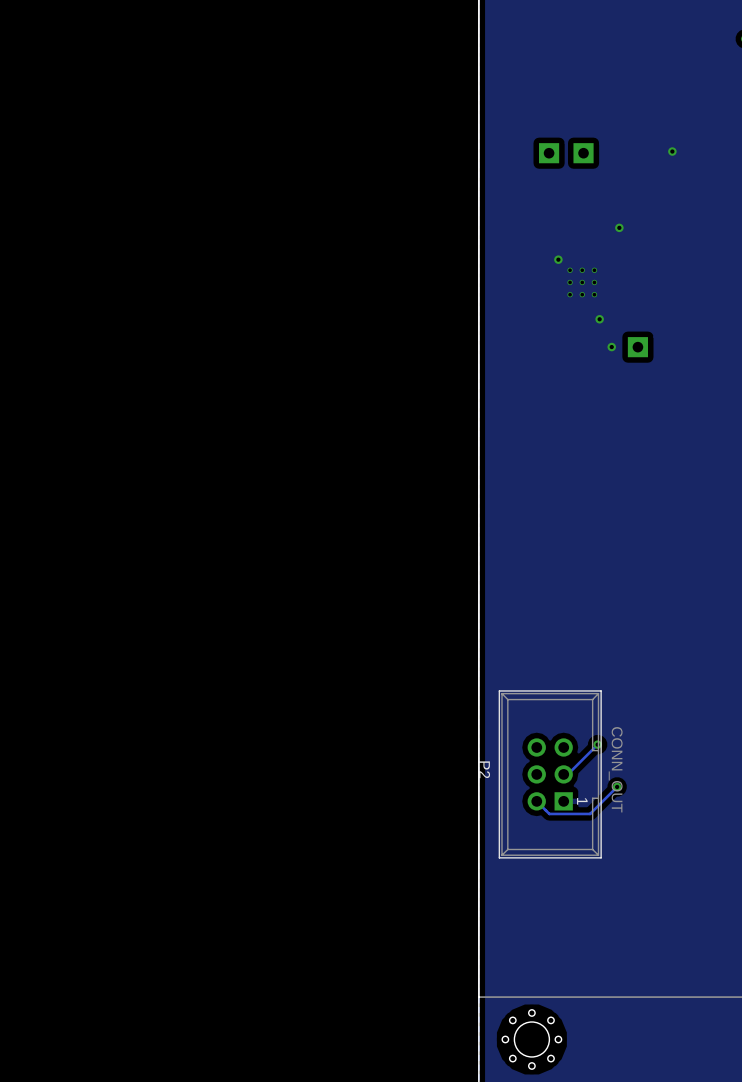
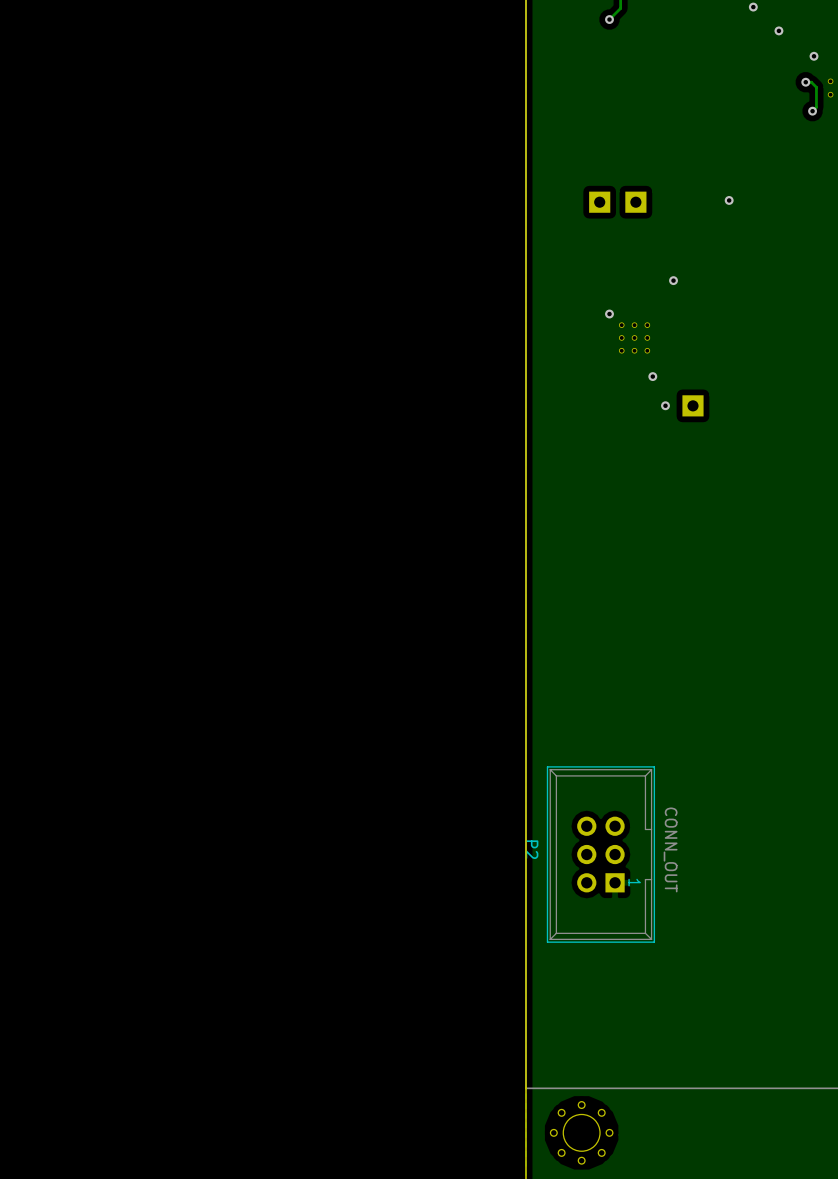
track: (597, 744) (567, 774) (563, 774) -> none
via: (597, 744) -> none
track: (617, 786) (590, 813) (549, 813) (536, 801) -> none
via: (617, 786) -> none

